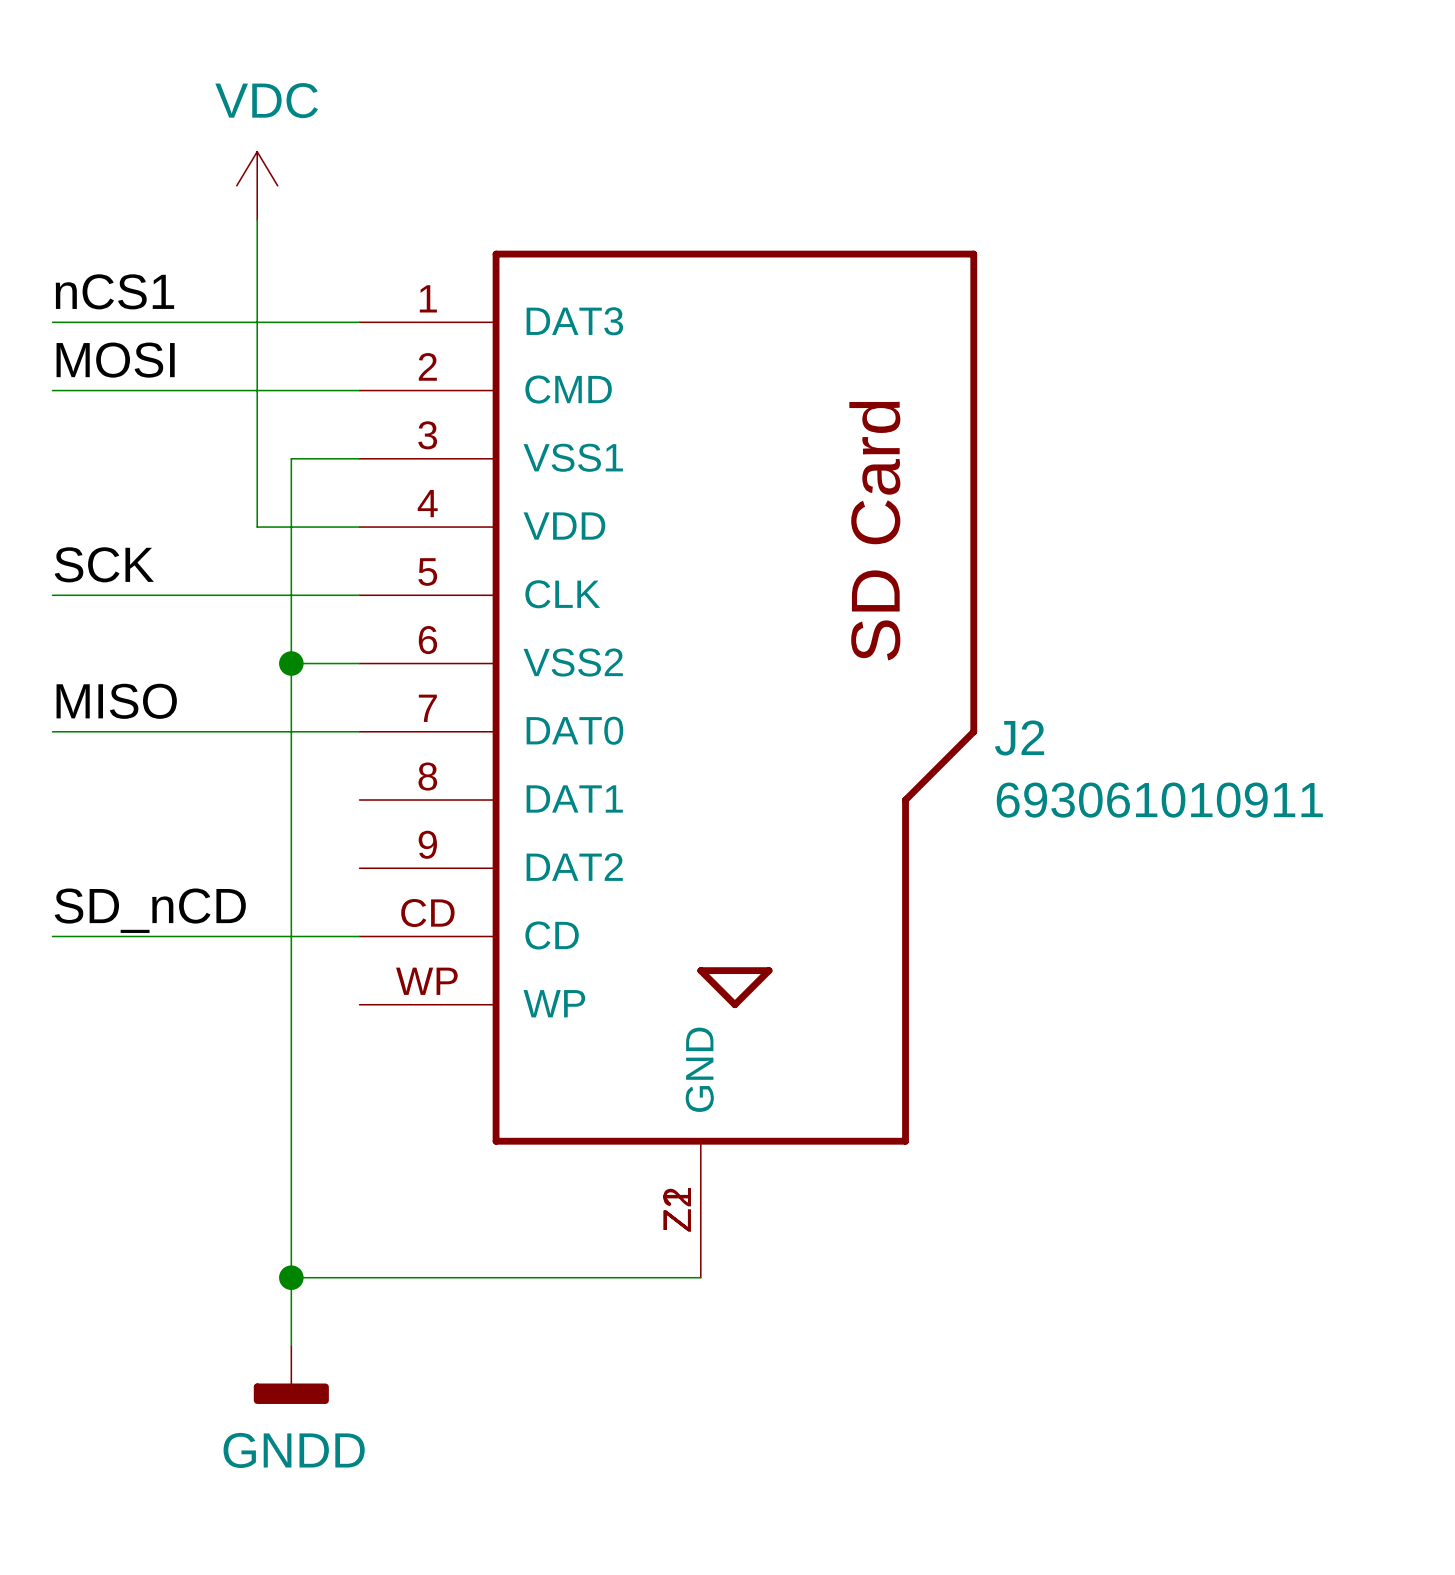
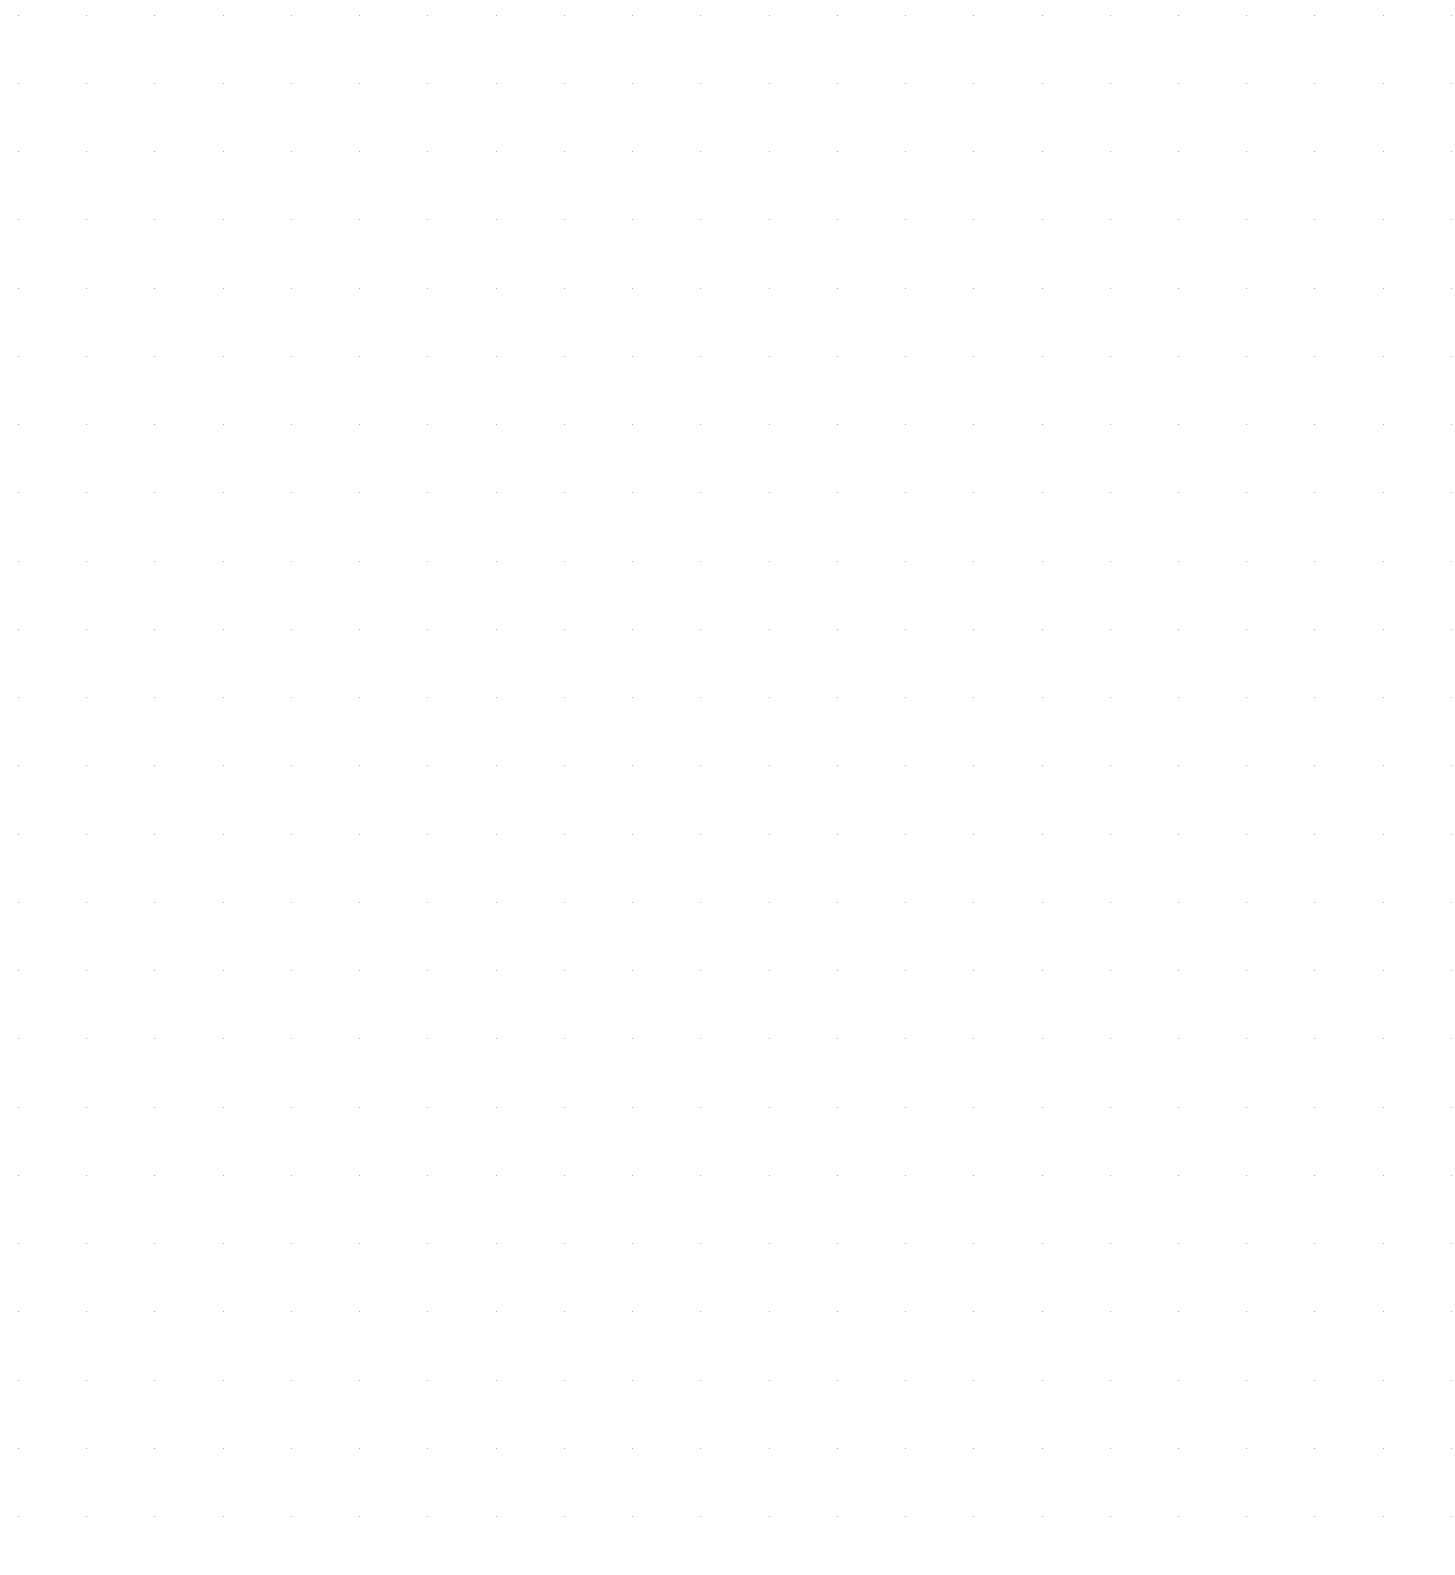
power symbol: VDC (257, 185) -> none
wire: (257, 219) (257, 527) (359, 527) -> none
label: nCS1 (114, 291) -> none
wire: (52, 322) (359, 322) -> none
label: MOSI (115, 360) -> none
wire: (52, 390) (359, 390) -> none
wire: (359, 458) (291, 458) (291, 1345) -> none
label: SCK (104, 564) -> none
wire: (52, 595) (359, 595) -> none
wire: (291, 663) (359, 663) -> none
junction: (291, 663) -> none
label: MISO (116, 701) -> none
wire: (52, 731) (359, 731) -> none
J2: 693061010911 (668, 764) -> none
label: SD_nCD (150, 910) -> none
wire: (52, 936) (359, 936) -> none
wire: (291, 1277) (700, 1277) -> none
junction: (291, 1277) -> none
power symbol: GNDD (291, 1374) -> none

